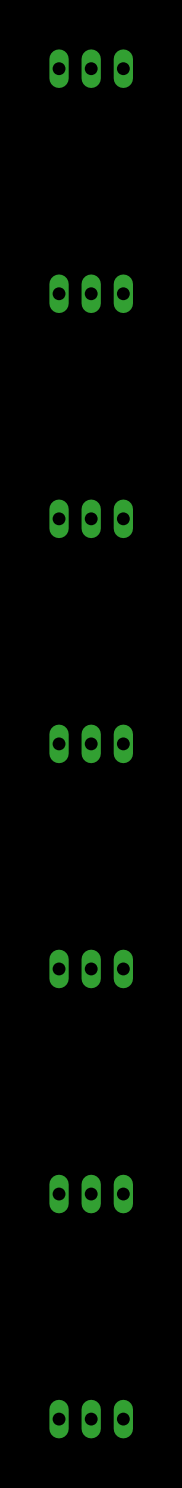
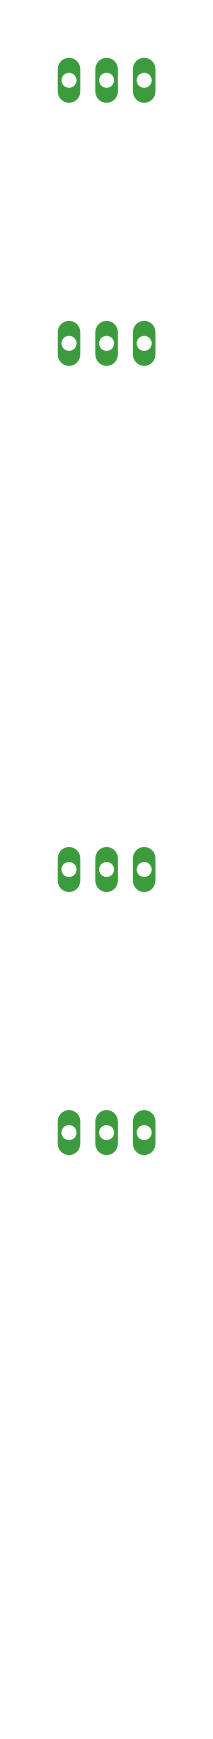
part: (91, 518) -> none
part: (91, 1194) -> none
part: (91, 1419) -> none

